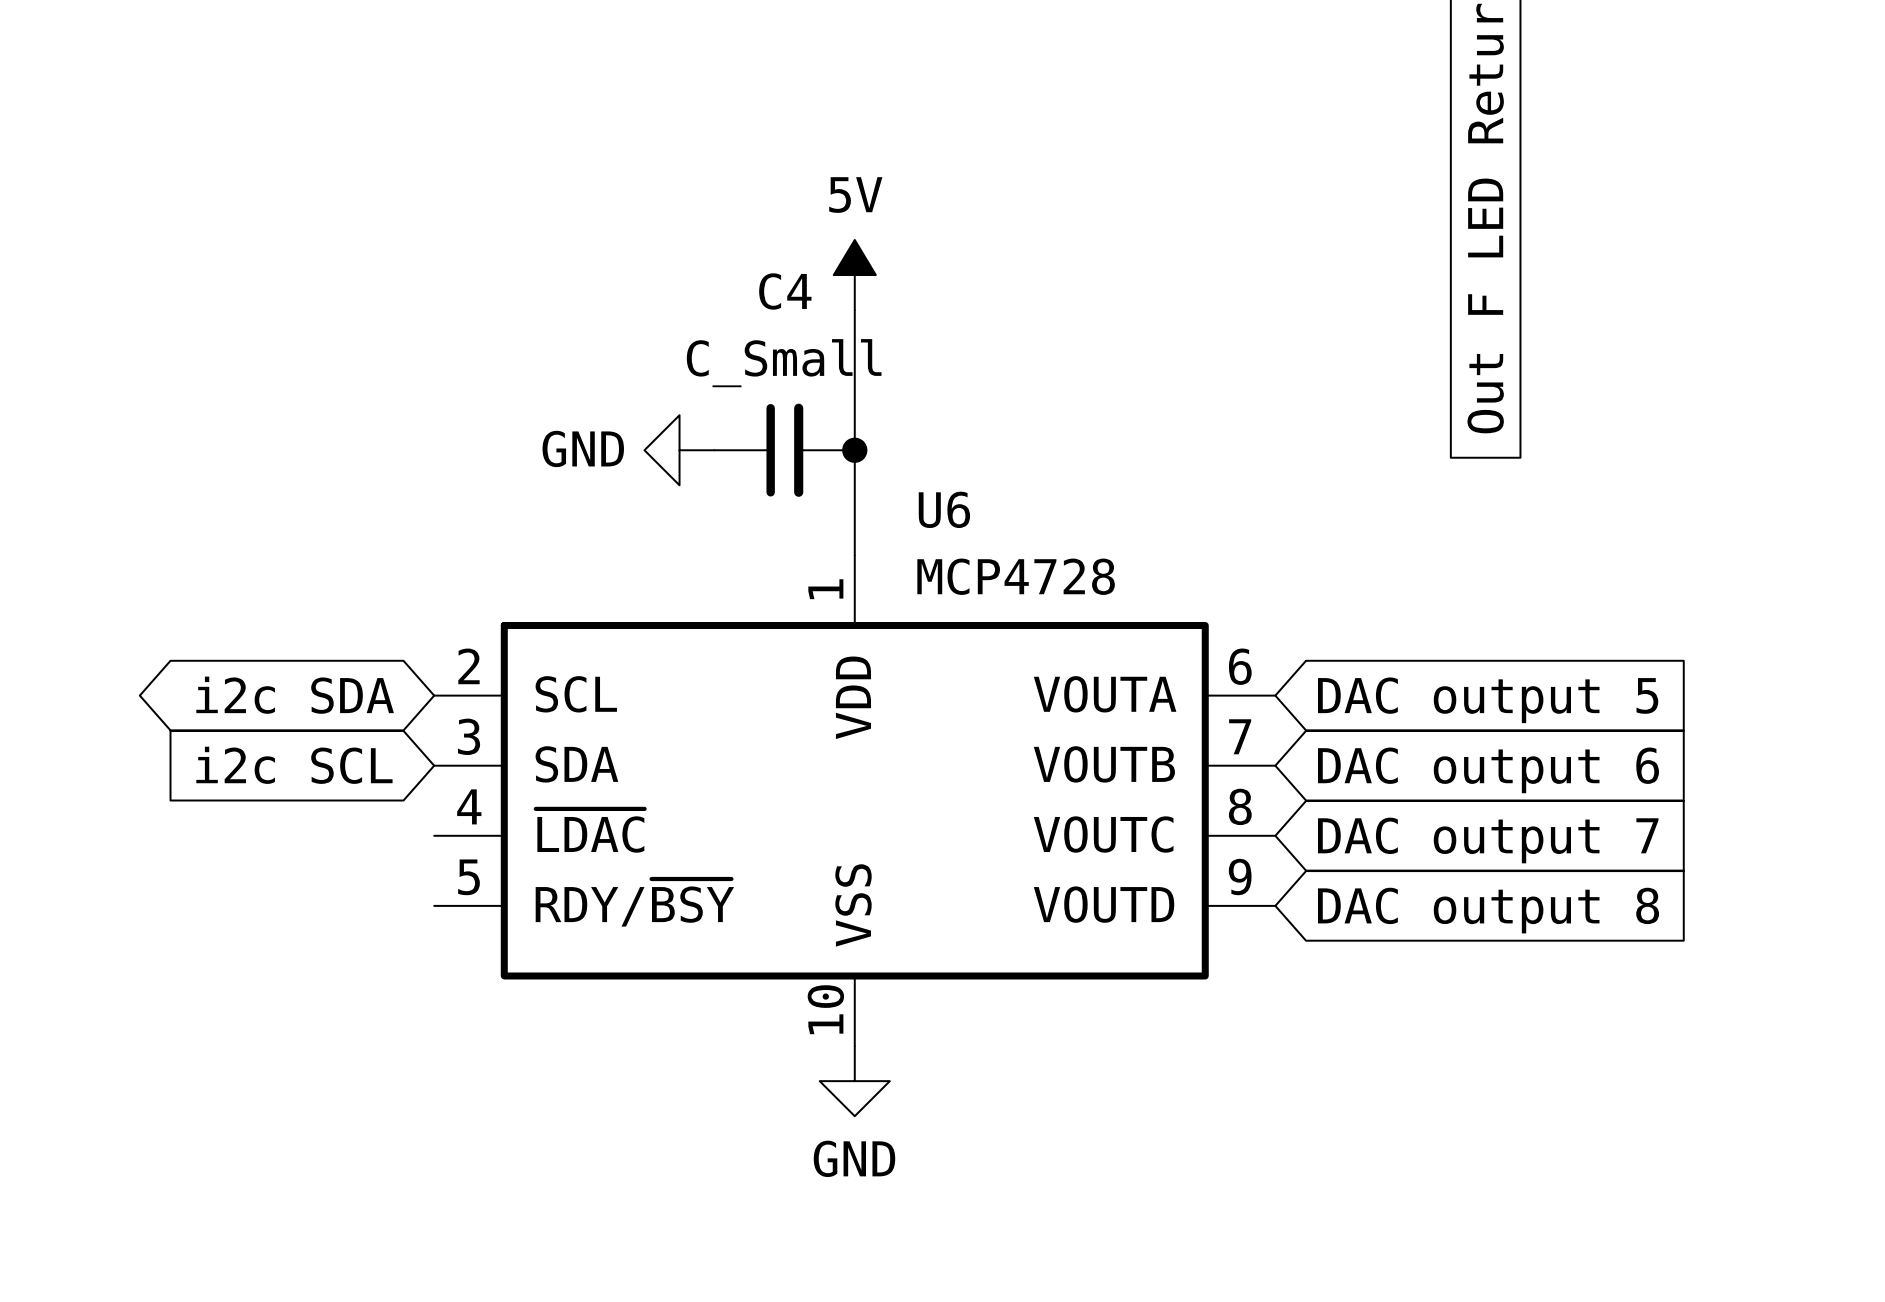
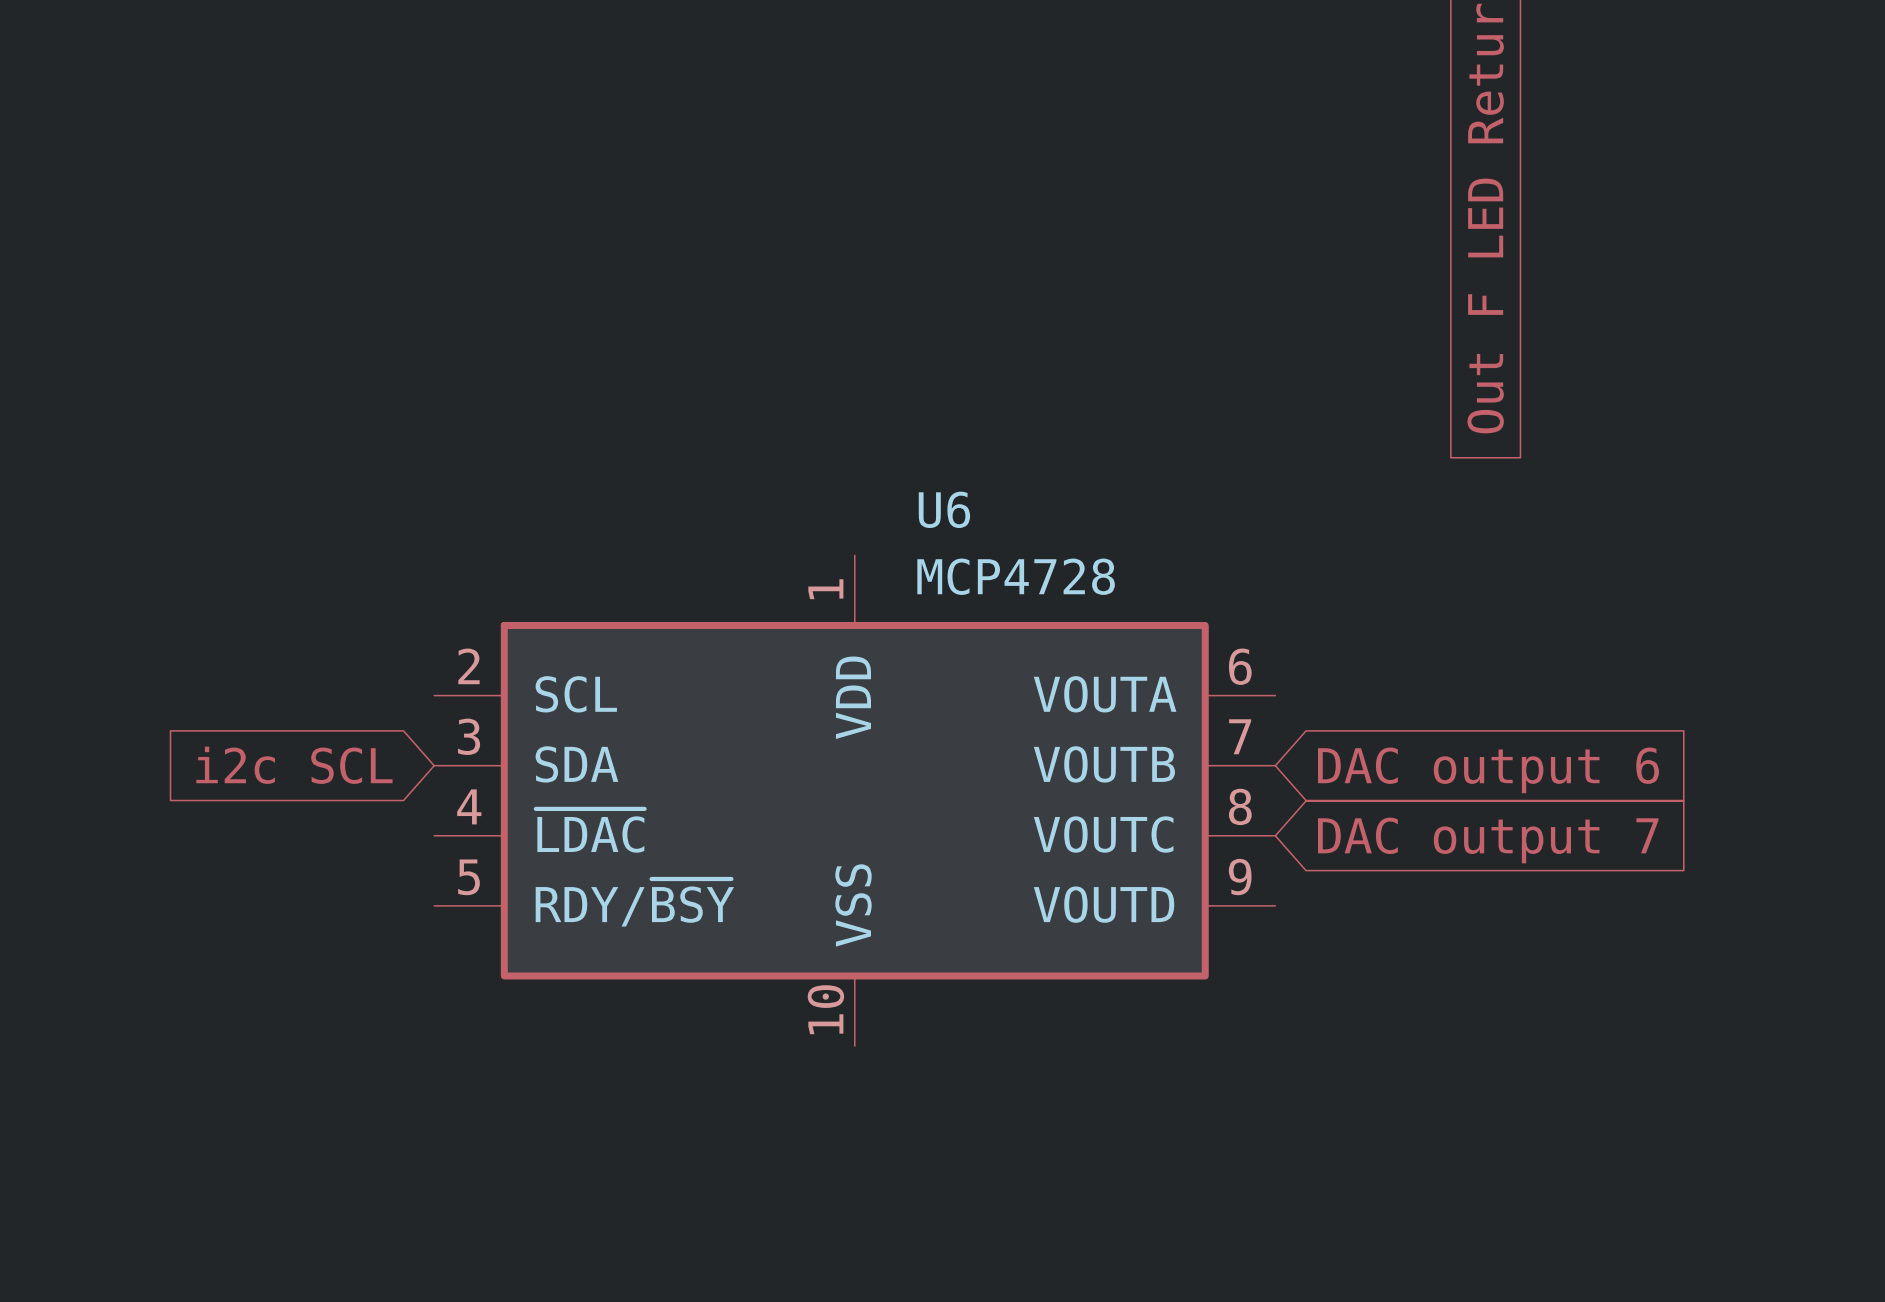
power symbol: 5V (854, 275) -> none
wire: (854, 310) (854, 555) -> none
power symbol: GND (679, 450) -> none
C4: C_Small (784, 450) -> none
junction: (854, 450) -> none
global label: i2c SDA (295, 695) -> none
global label: DAC output 5 (1488, 700) -> none
global label: DAC output 8 (1488, 910) -> none
power symbol: GND (854, 1081) -> none

